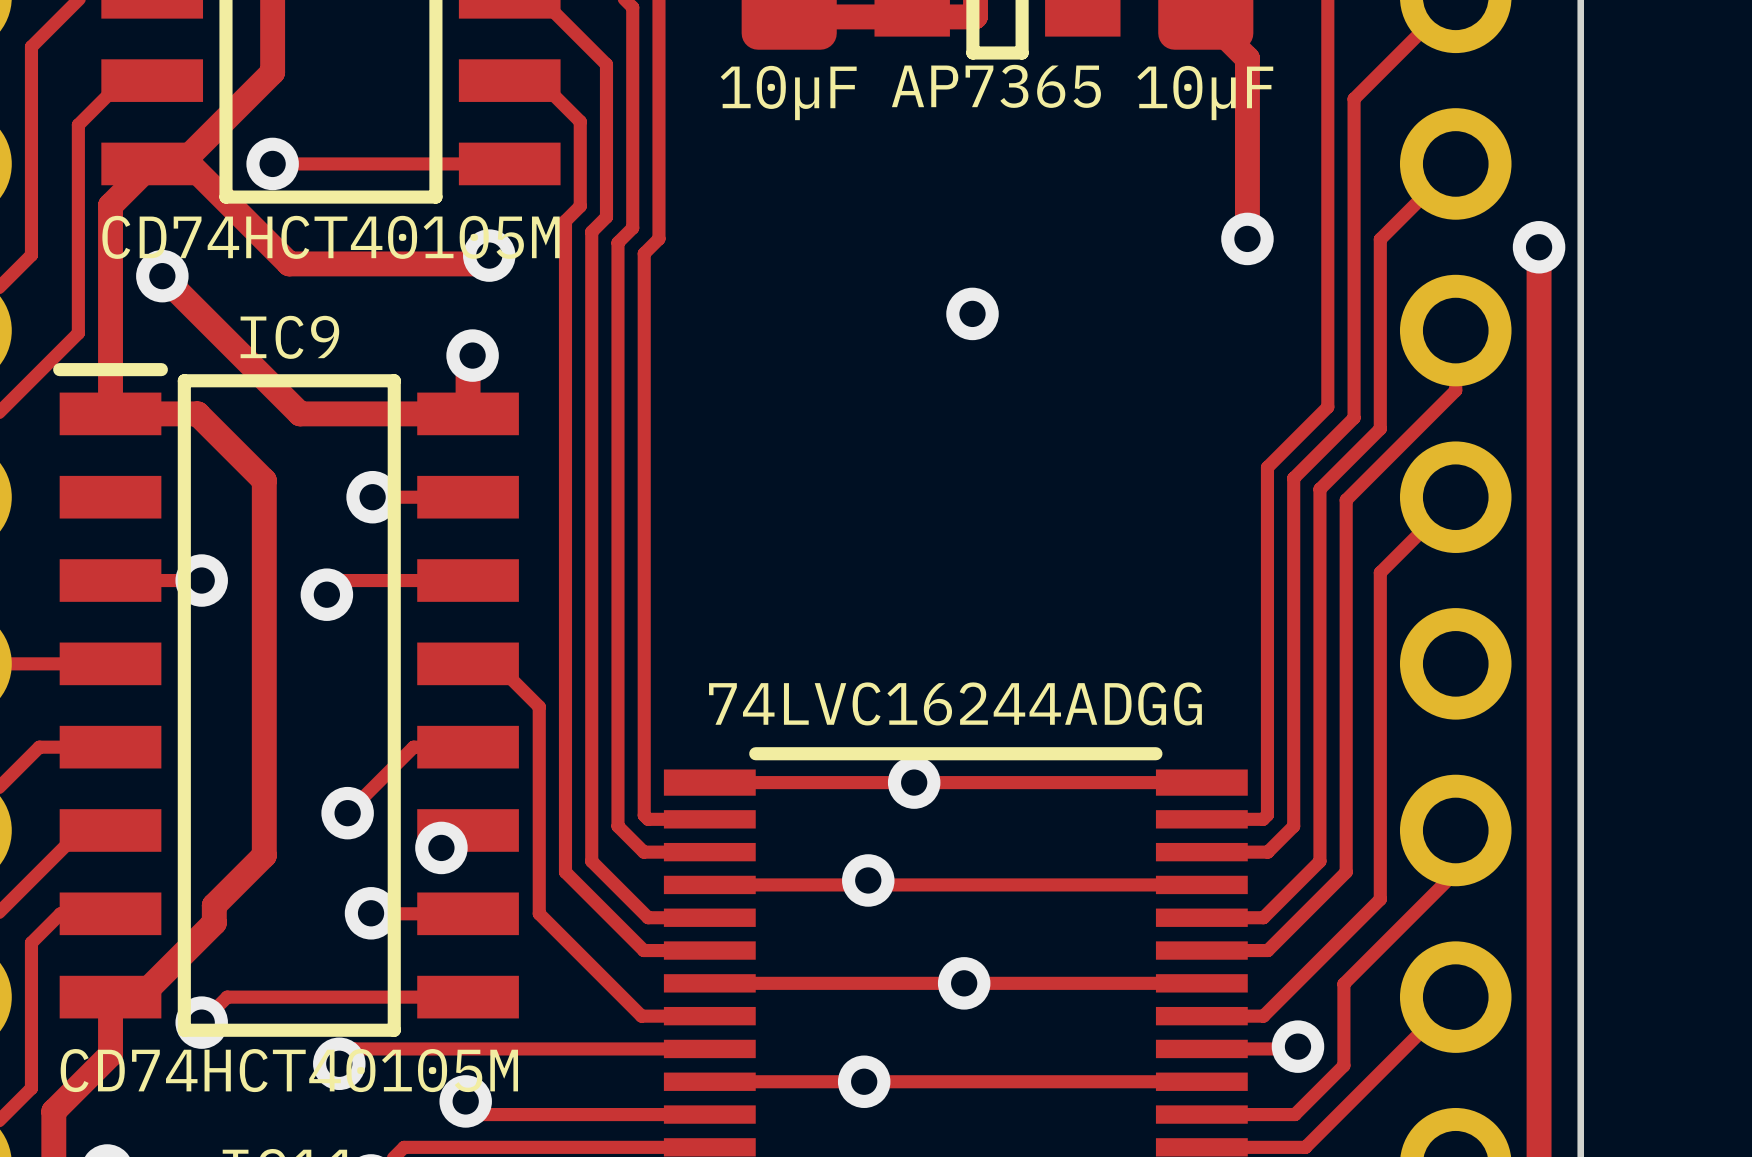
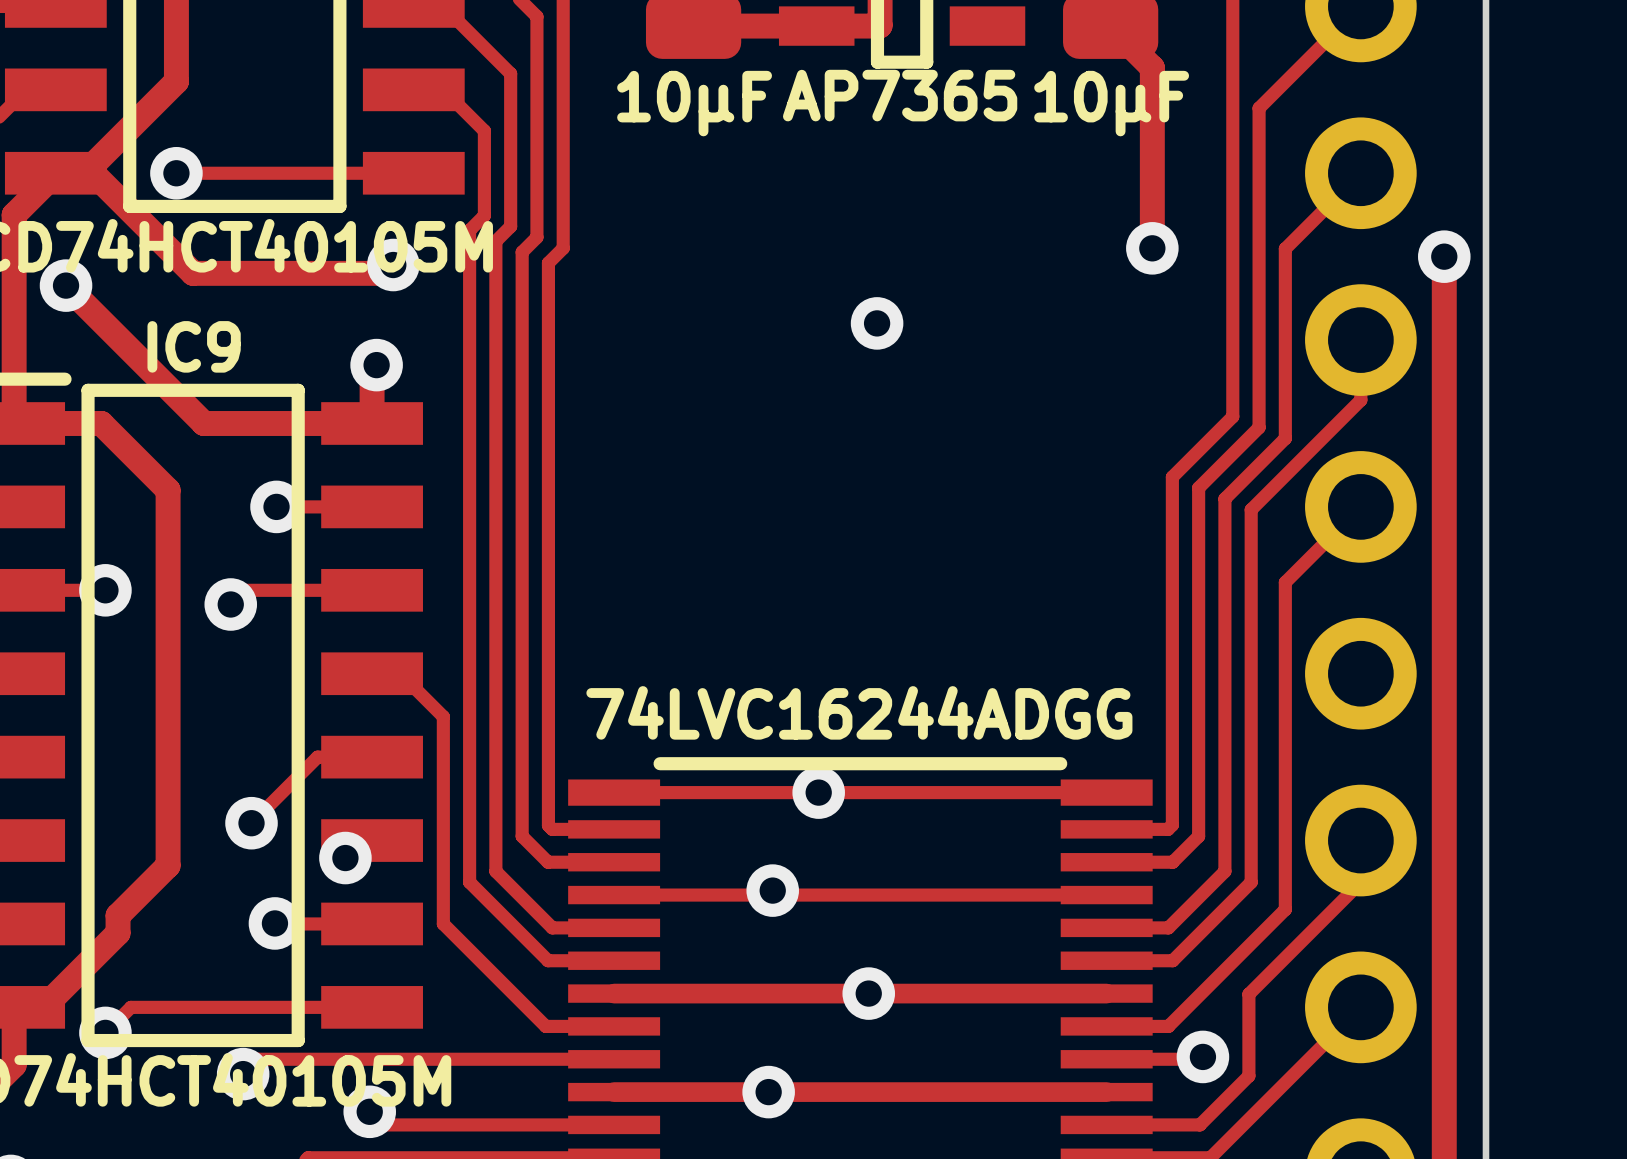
track width: thin (709, 983) (1201, 983) -> thick (614, 993) (1106, 993)
track width: thin (709, 1081) (1201, 1081) -> thick (614, 1092) (1106, 1092)

